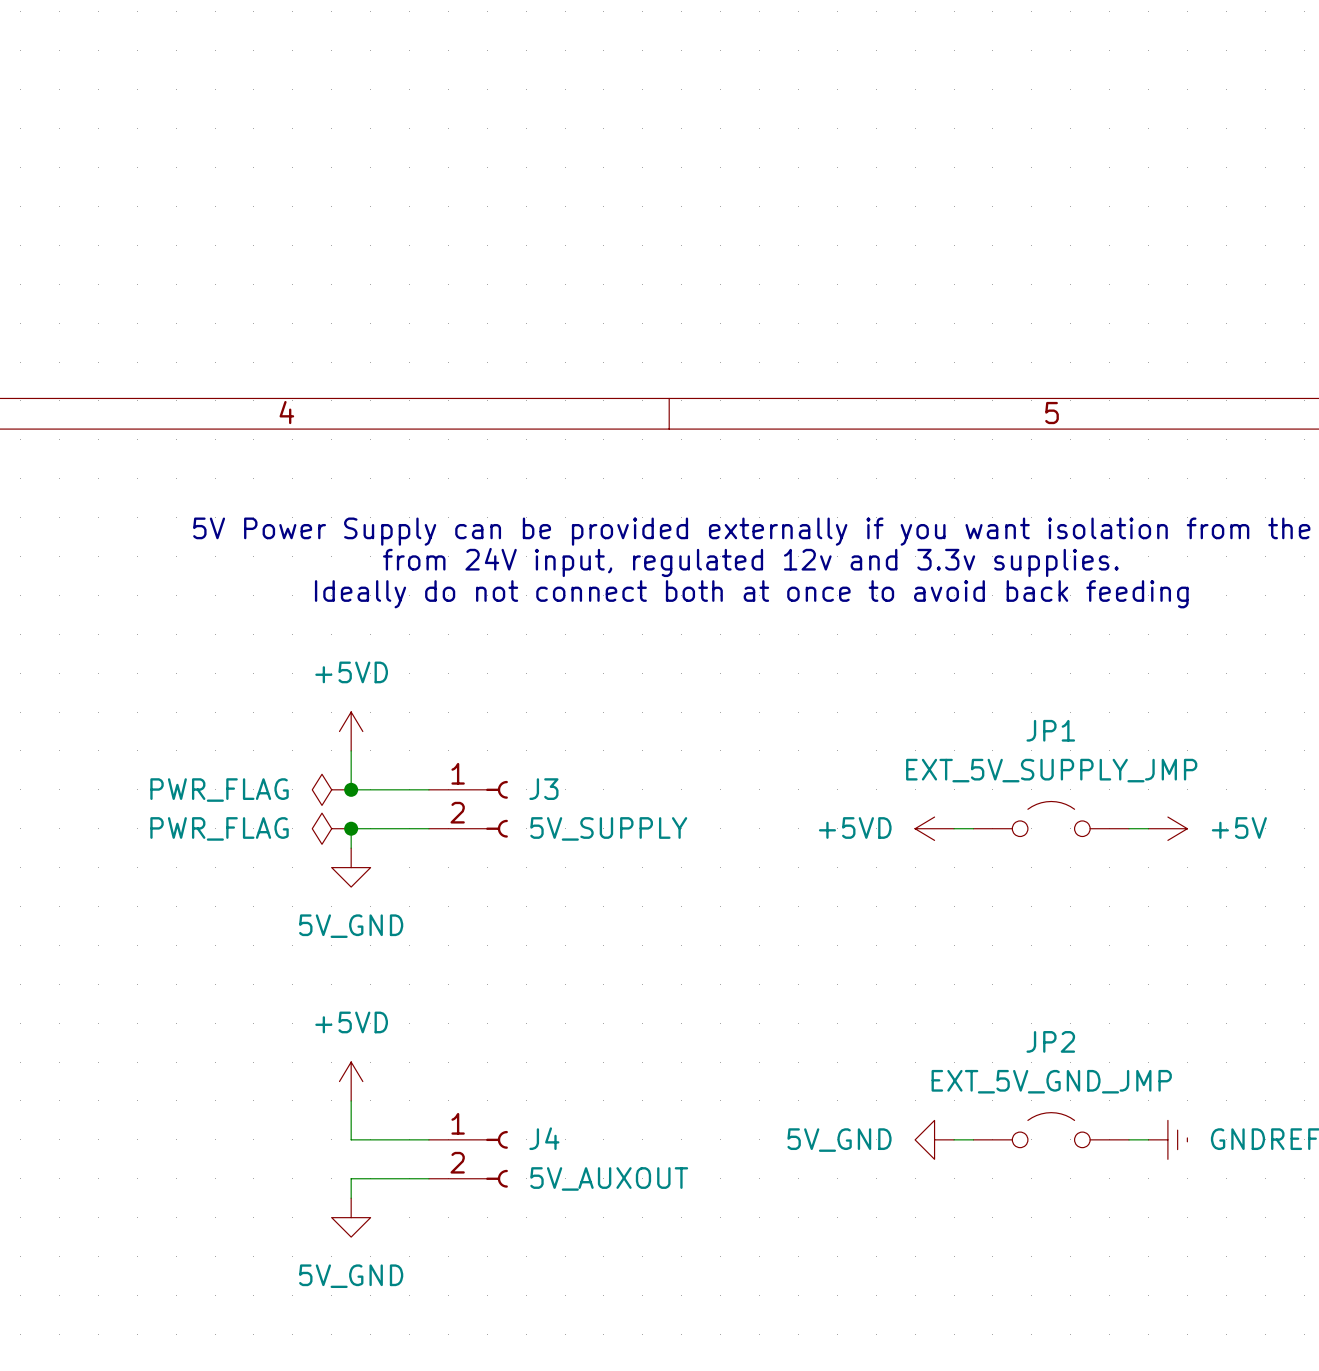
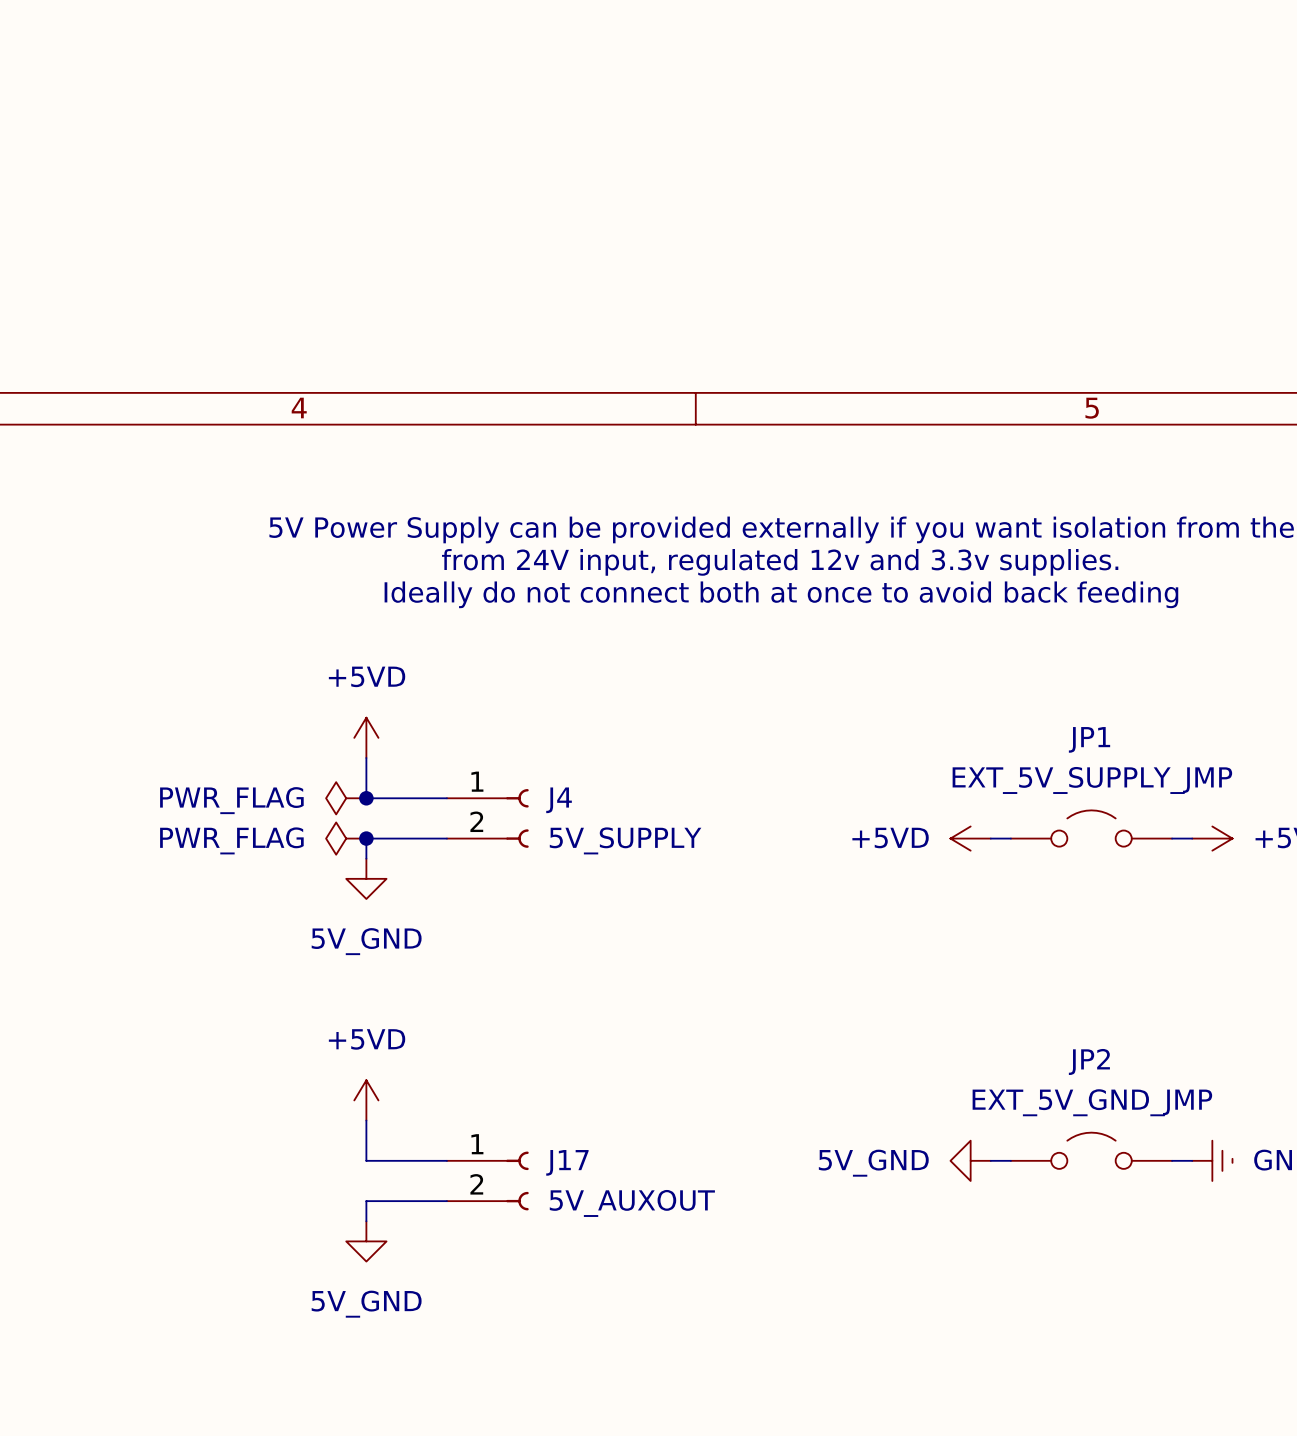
J3 name: J3 (543, 789) -> J4 (559, 800)
J4 name: J4 (544, 1138) -> J17 (567, 1162)

